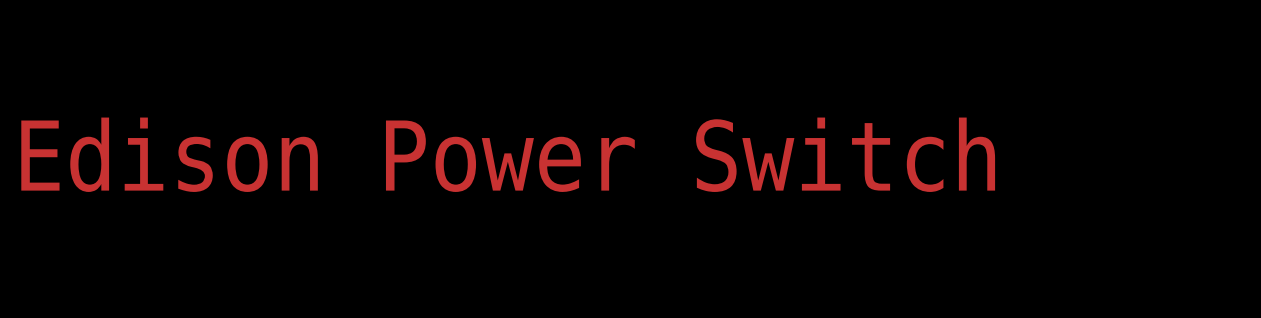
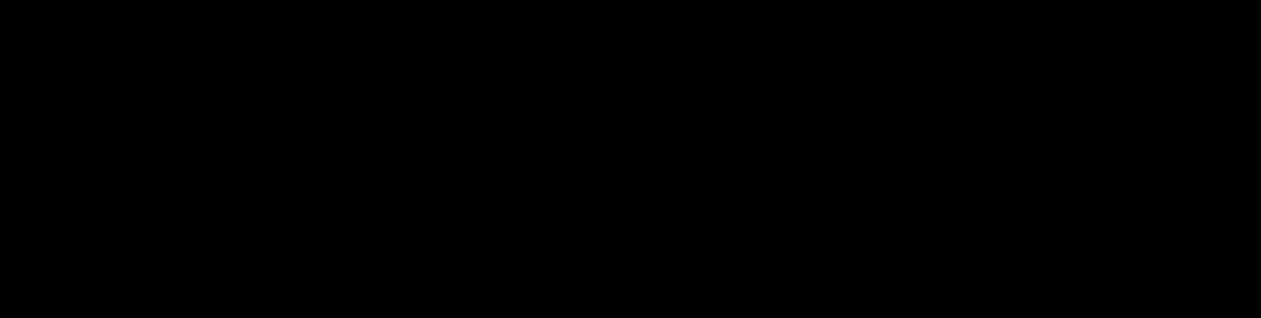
text: Edison Power Switch (508, 154) -> none

